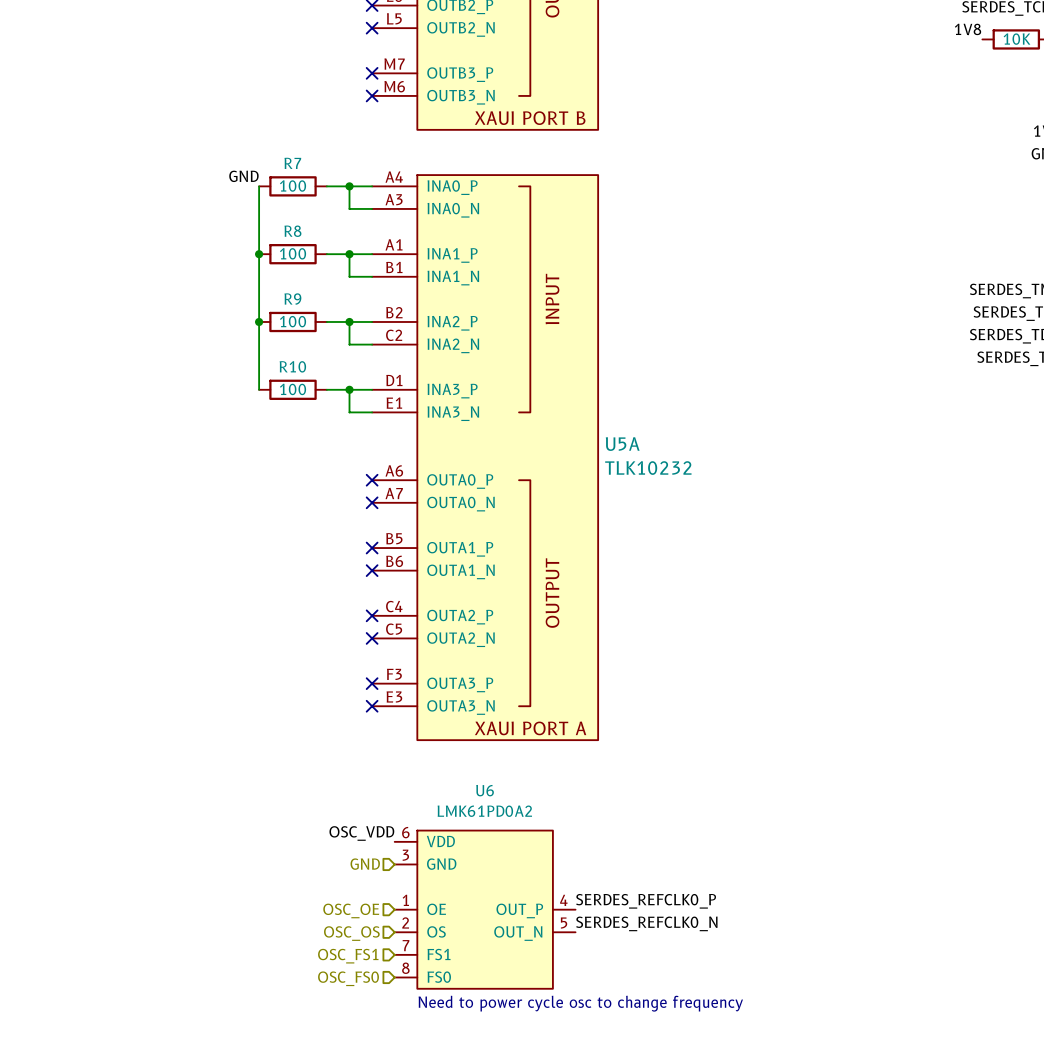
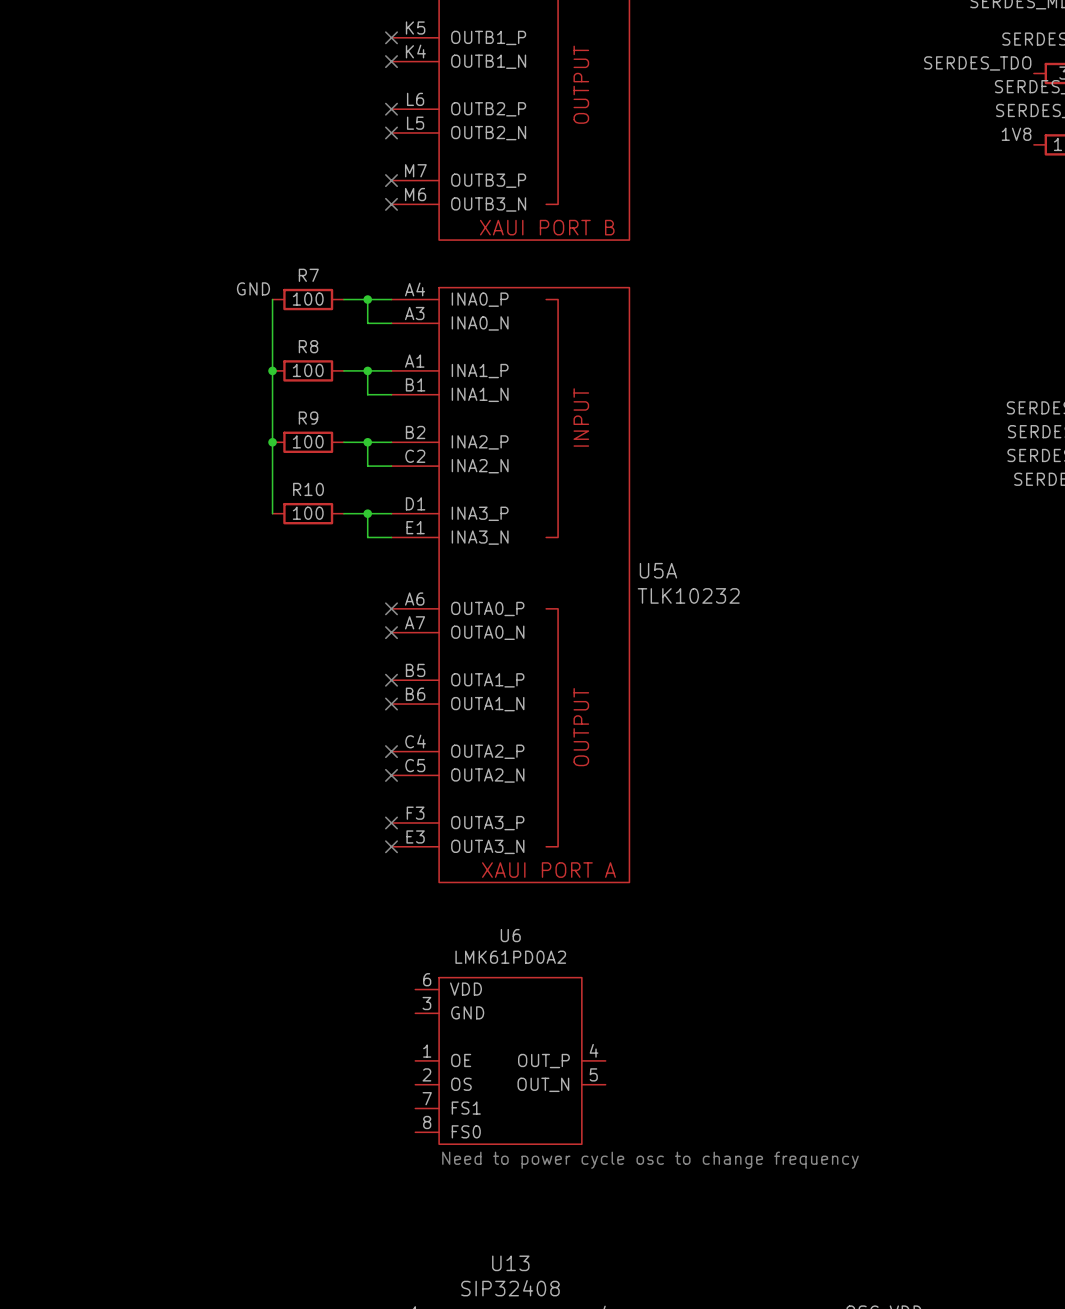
label: OSC_VDD (361, 833) -> none
hierarchical label: GND (365, 864) -> none
label: SERDES_REFCLK0_P (646, 901) -> none
hierarchical label: OSC_OE (351, 910) -> none
label: SERDES_REFCLK0_N (646, 923) -> none
hierarchical label: OSC_OS (351, 933) -> none
hierarchical label: OSC_FS1 (348, 956) -> none
hierarchical label: OSC_FS0 (348, 978) -> none

